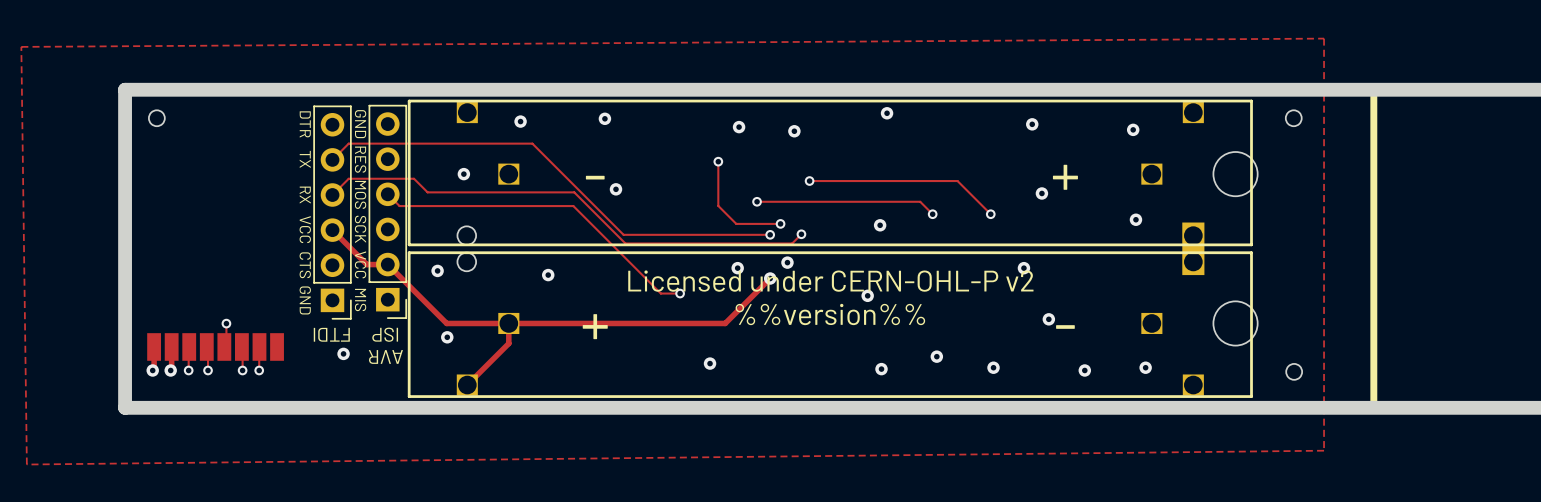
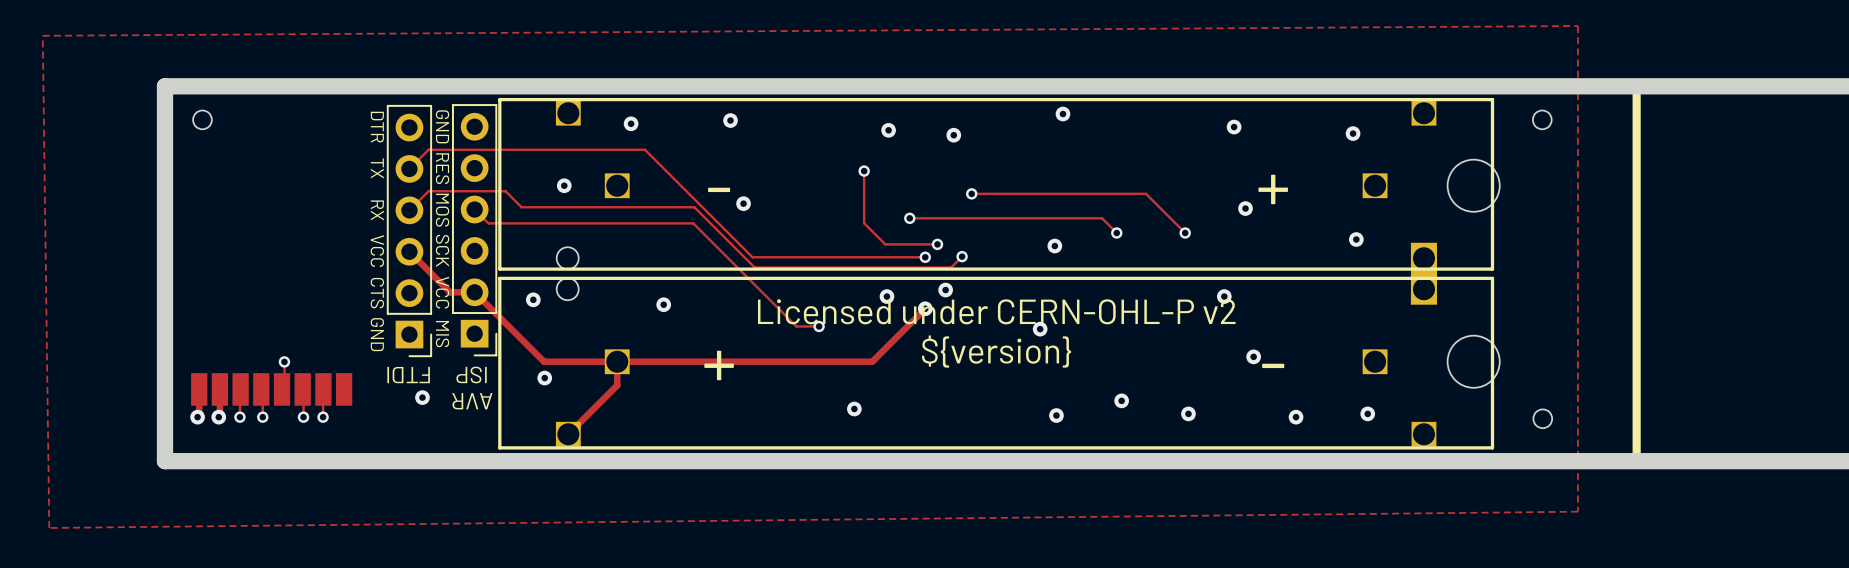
text: %%version%% (830, 314) -> ${version} (996, 351)

